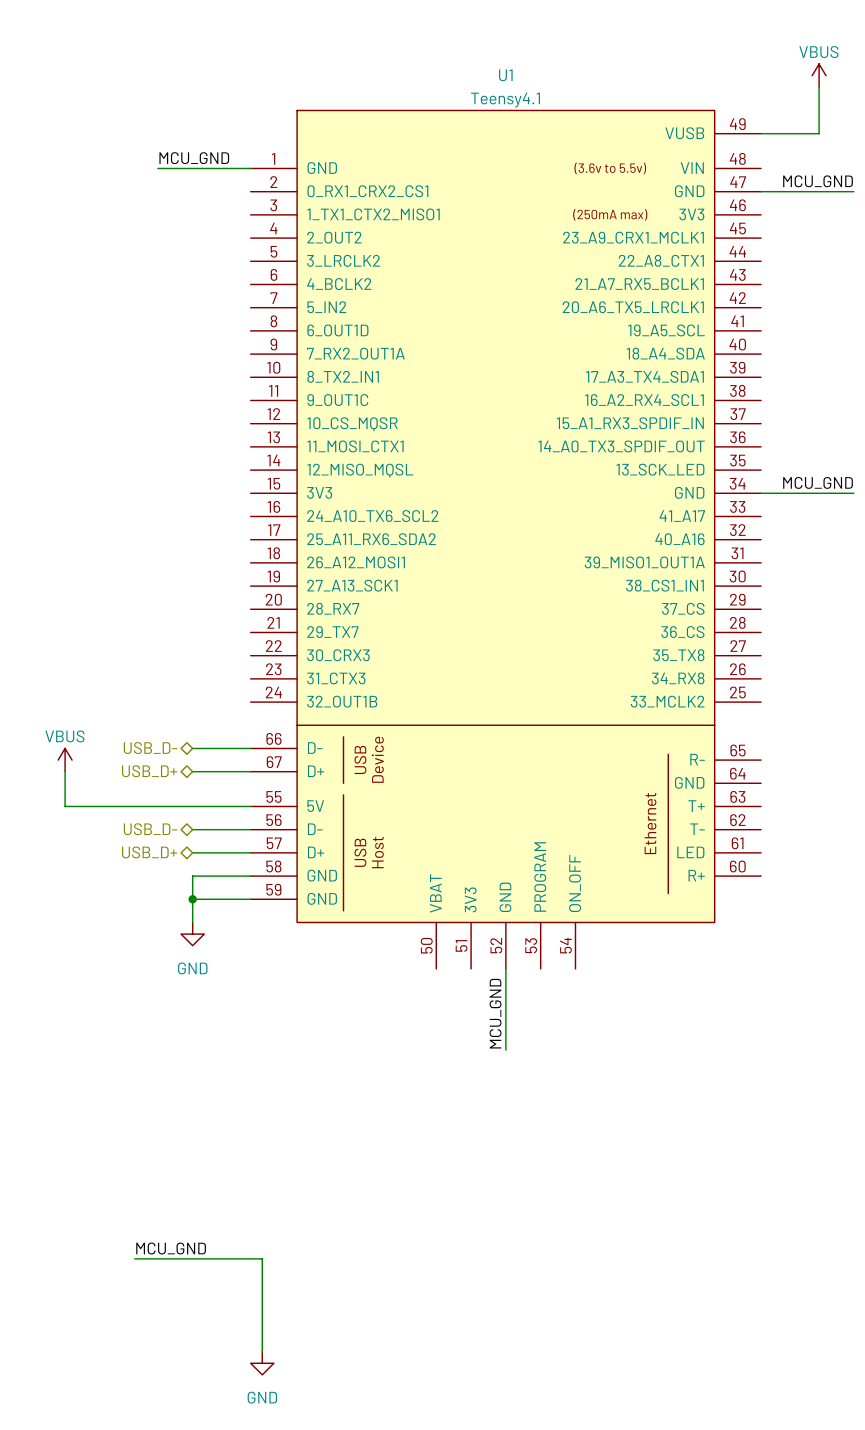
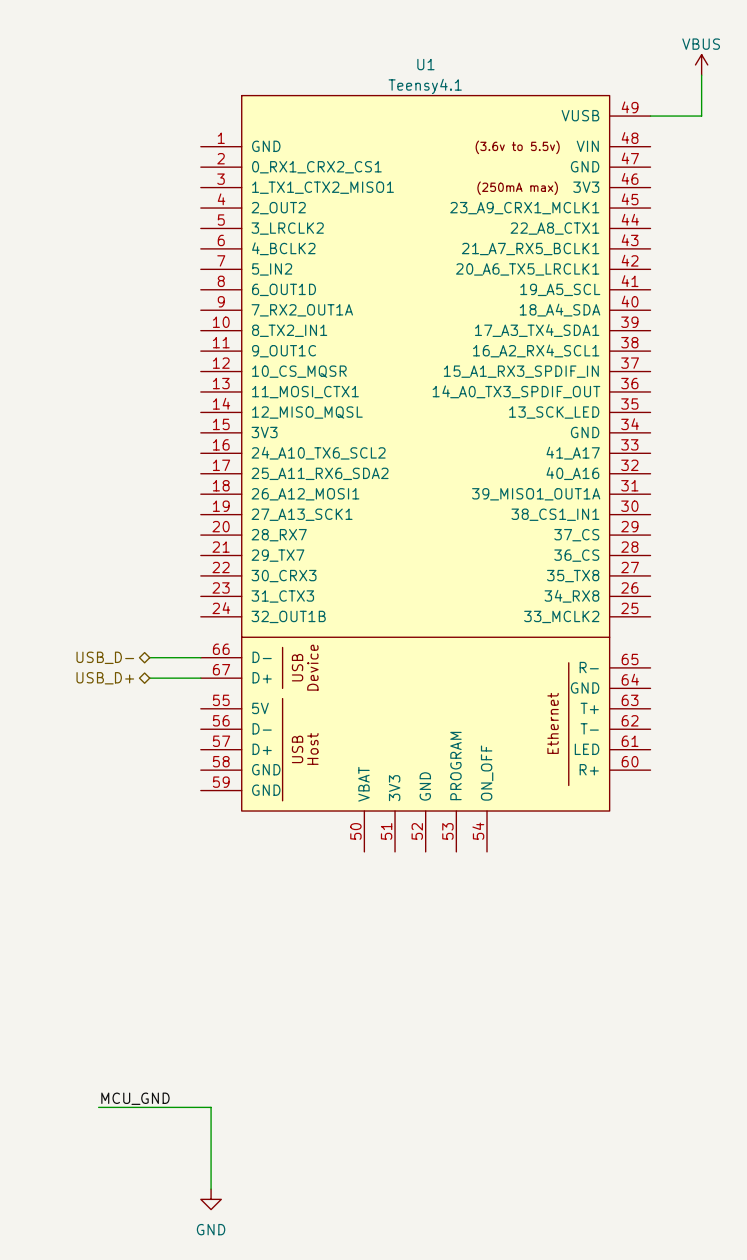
label: MCU_GND (194, 158) -> none
wire: (157, 168) (250, 168) -> none
label: MCU_GND (818, 181) -> none
wire: (761, 191) (853, 191) -> none
label: MCU_GND (818, 482) -> none
wire: (761, 493) (853, 493) -> none
power symbol: VBUS (65, 760) -> none
wire: (65, 771) (65, 806) (250, 806) -> none
hierarchical label: USB_D- (150, 829) -> none
wire: (192, 829) (250, 829) -> none
hierarchical label: USB_D+ (149, 852) -> none
wire: (192, 852) (250, 852) -> none
wire: (250, 876) (192, 876) (192, 922) -> none
wire: (192, 899) (250, 899) -> none
junction: (192, 899) -> none
power symbol: GND (192, 934) -> none
wire: (505, 968) (505, 1050) -> none
label: MCU_GND (495, 1013) -> none

